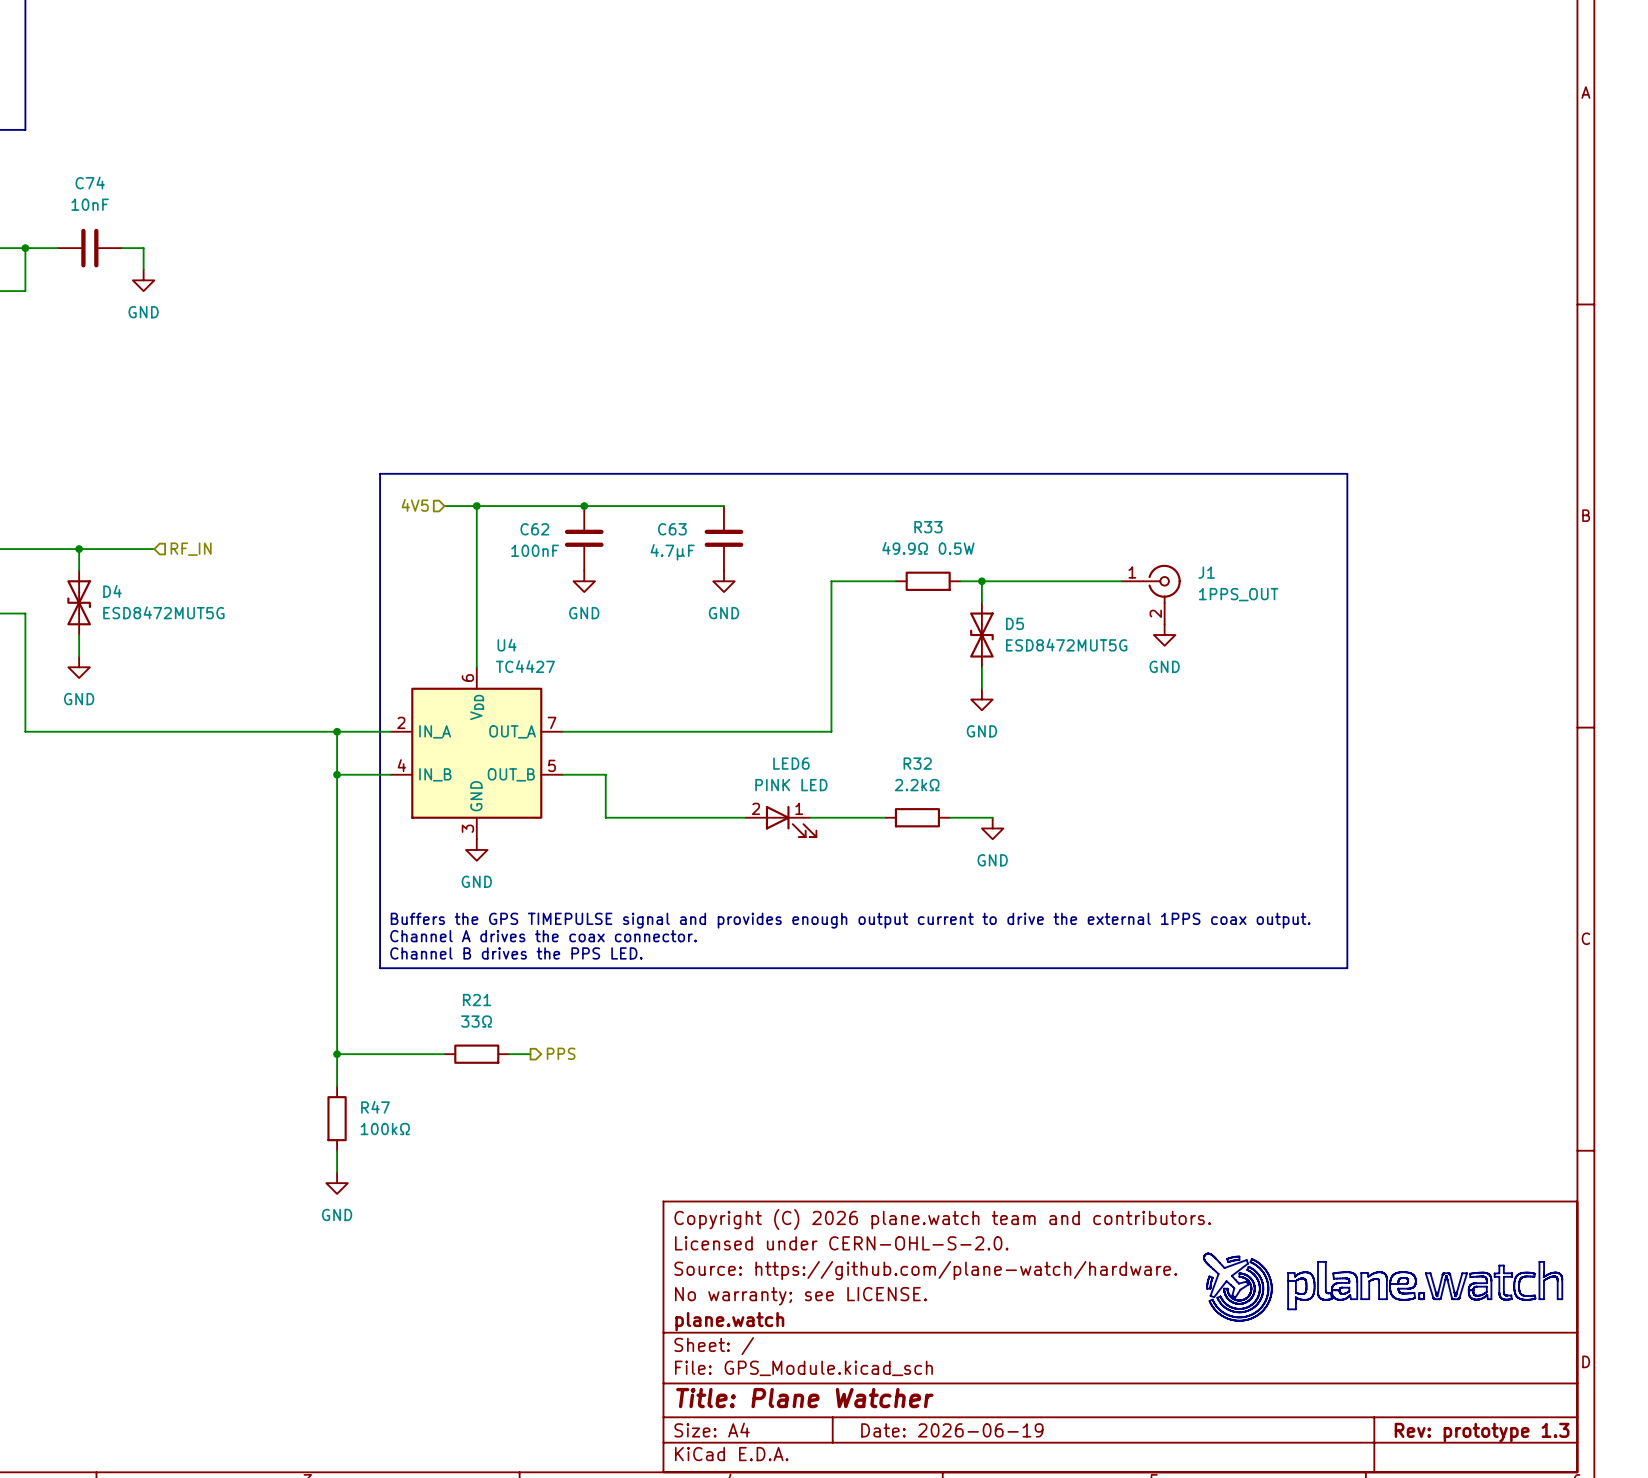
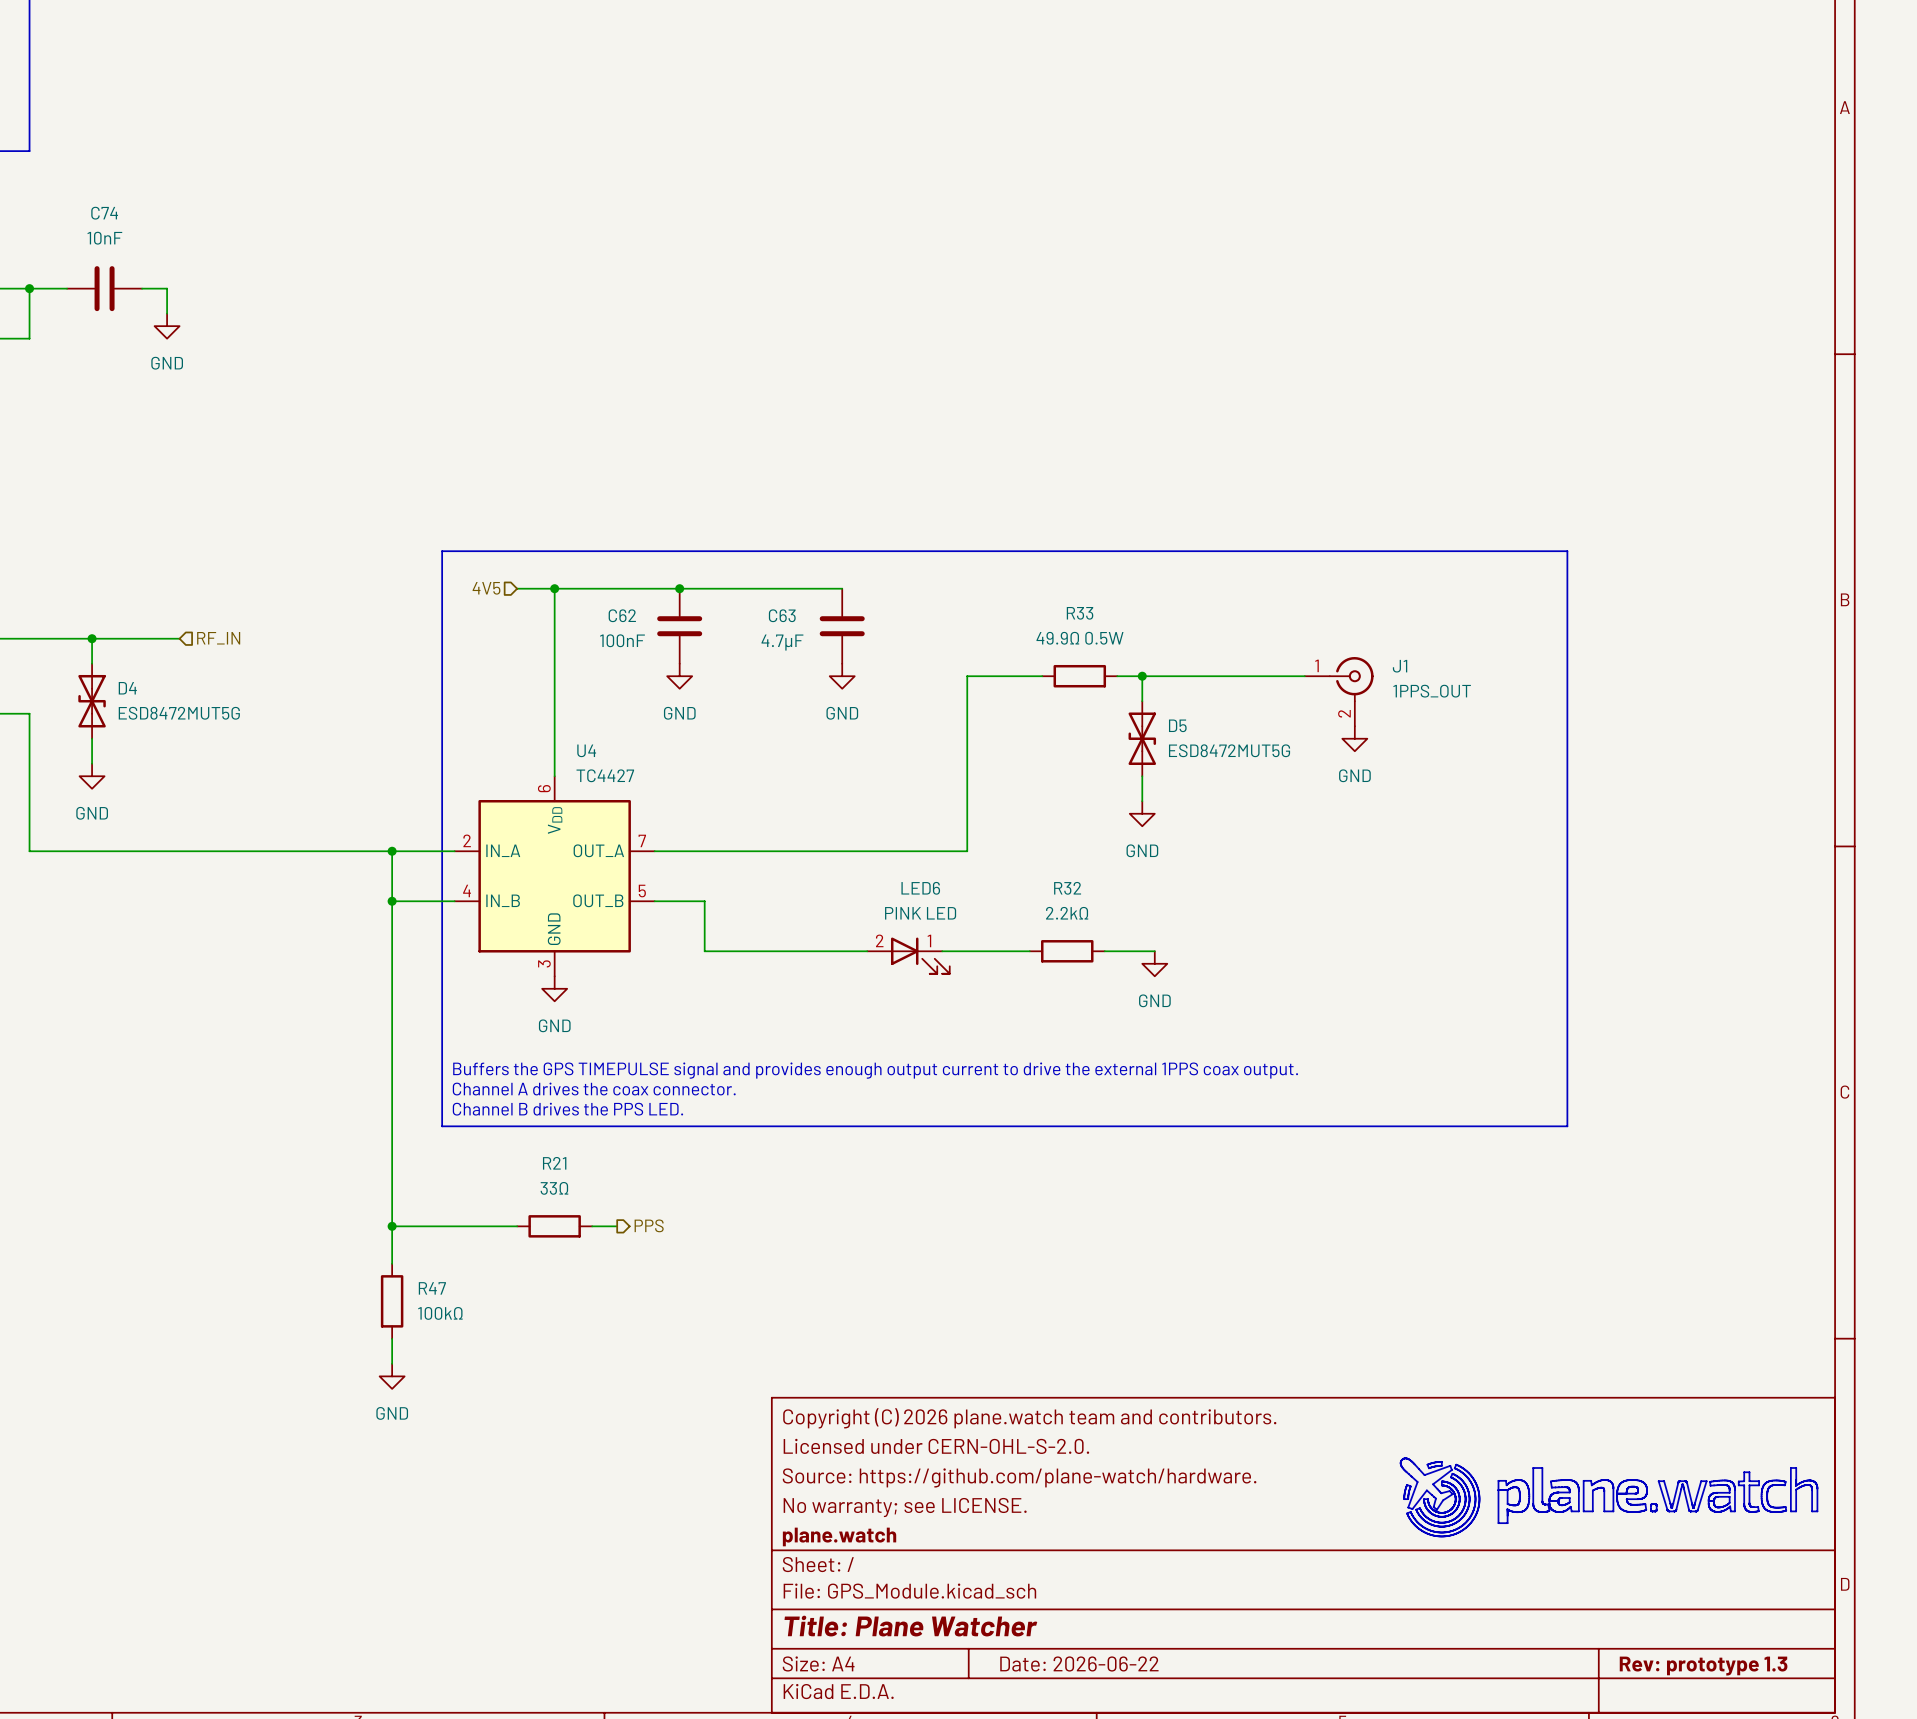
title block: Date: 2026-06-19 (952, 1430) -> Date: 2026-06-22 (1079, 1663)

